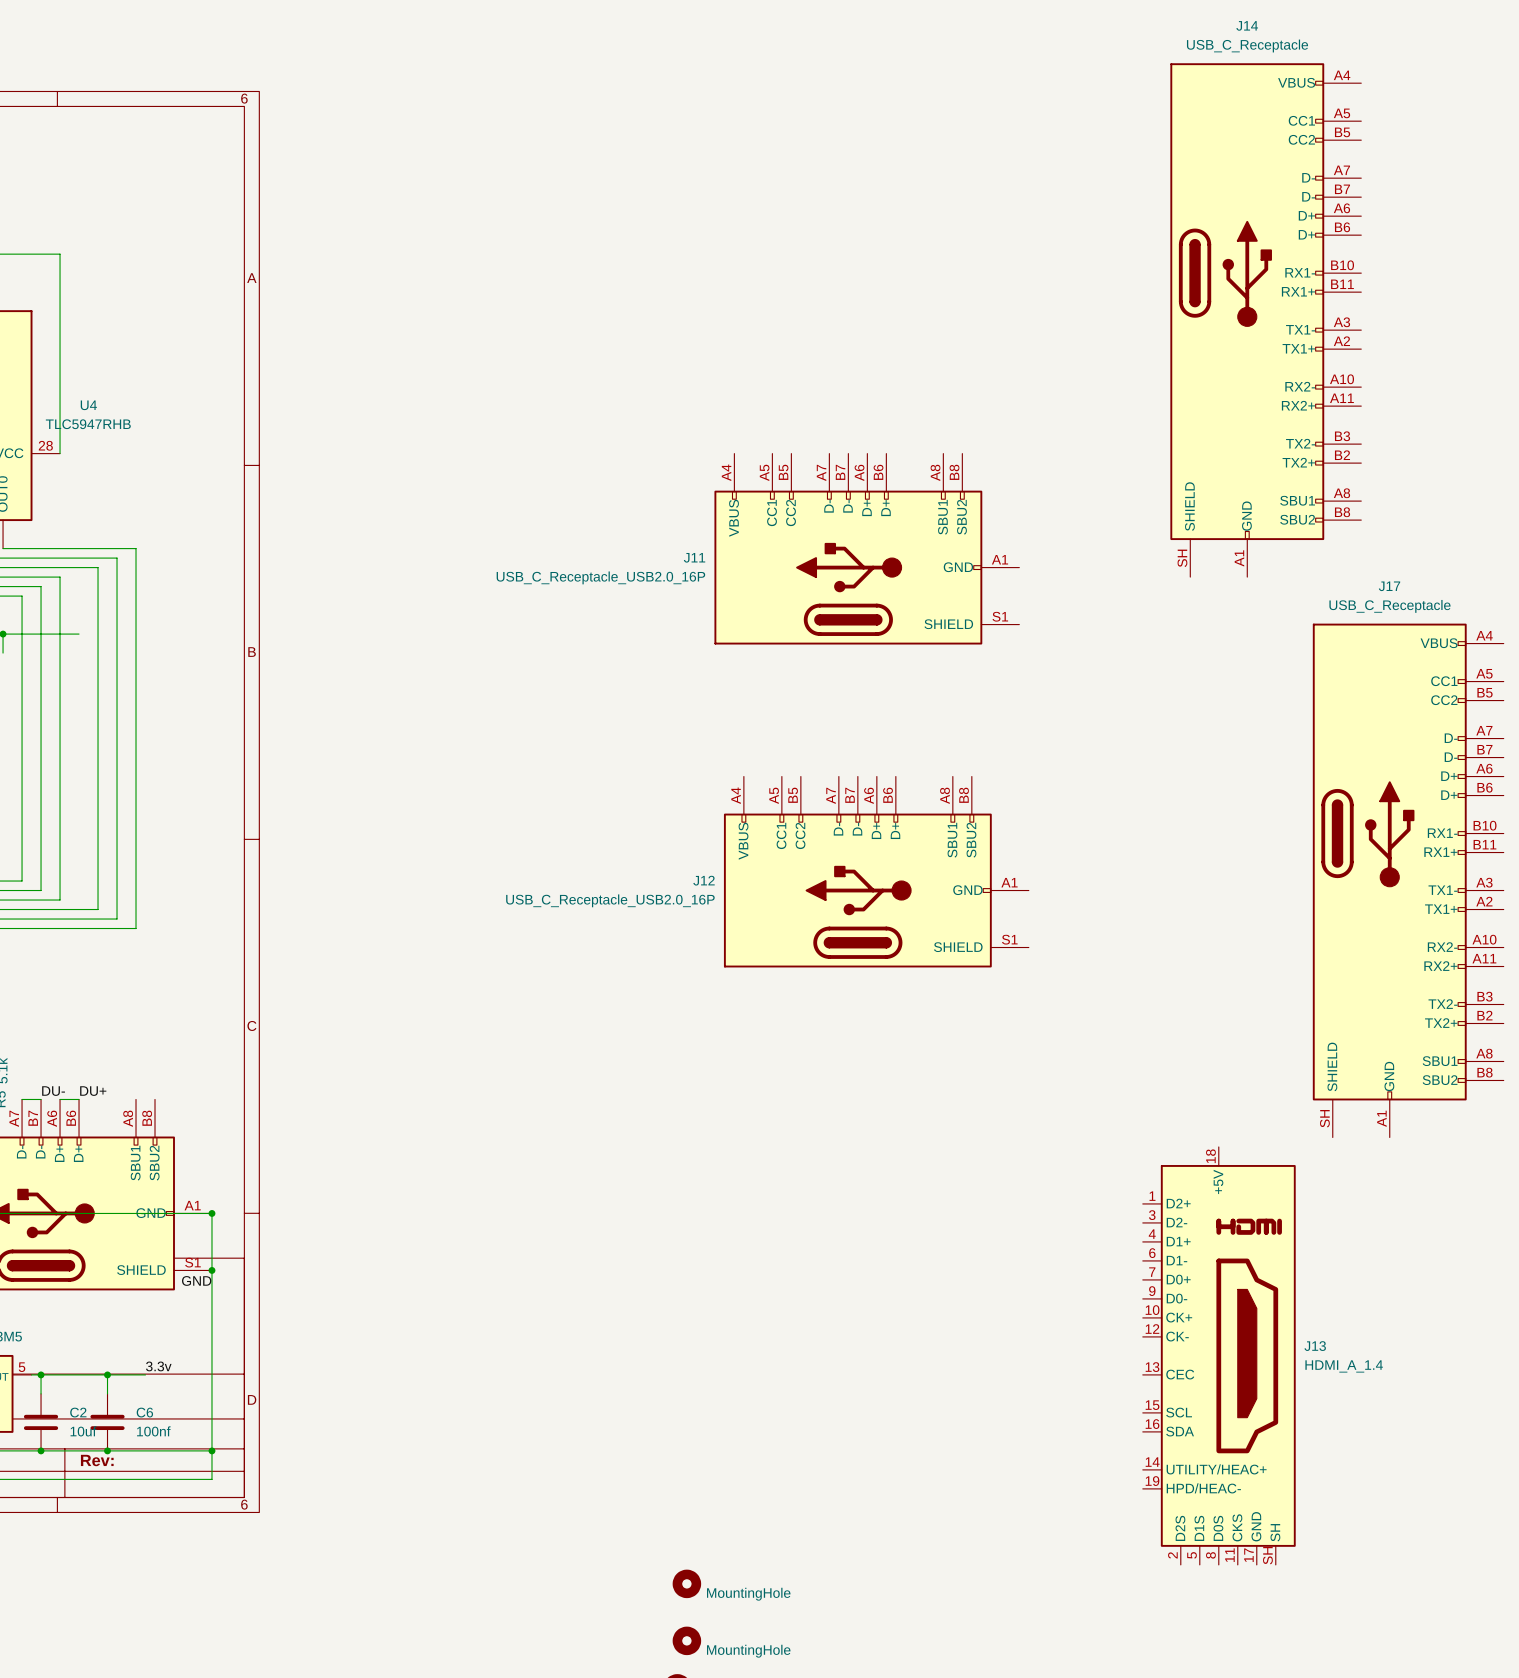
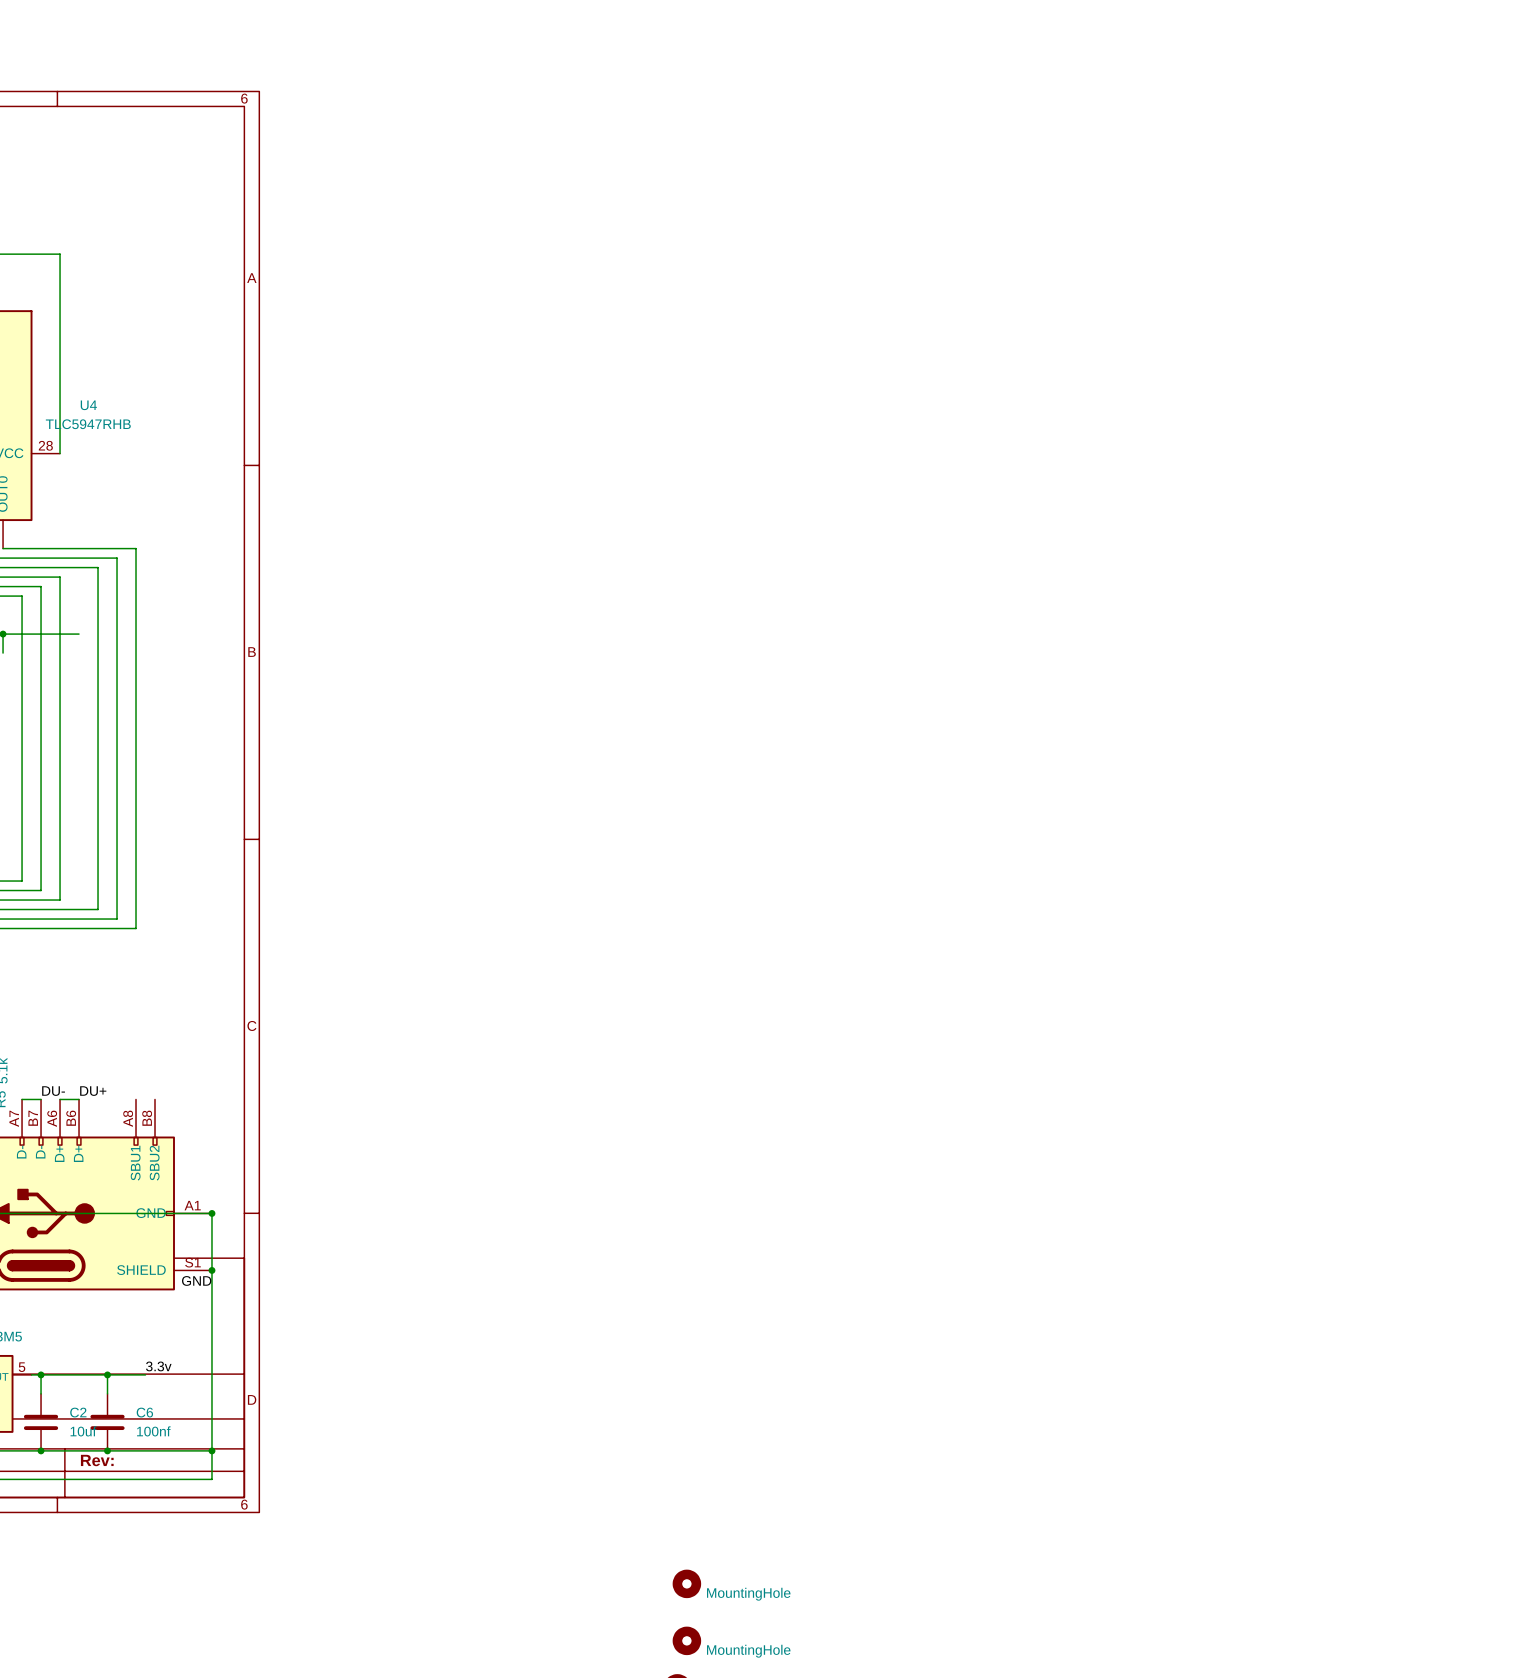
J14: USB_C_Receptacle (1265, 320) -> none
J11: USB_C_Receptacle_USB2.0_16P (866, 549) -> none
J12: USB_C_Receptacle_USB2.0_16P (876, 872) -> none
J17: USB_C_Receptacle (1408, 880) -> none
J13: HDMI_A_1.4 (1219, 1355) -> none

